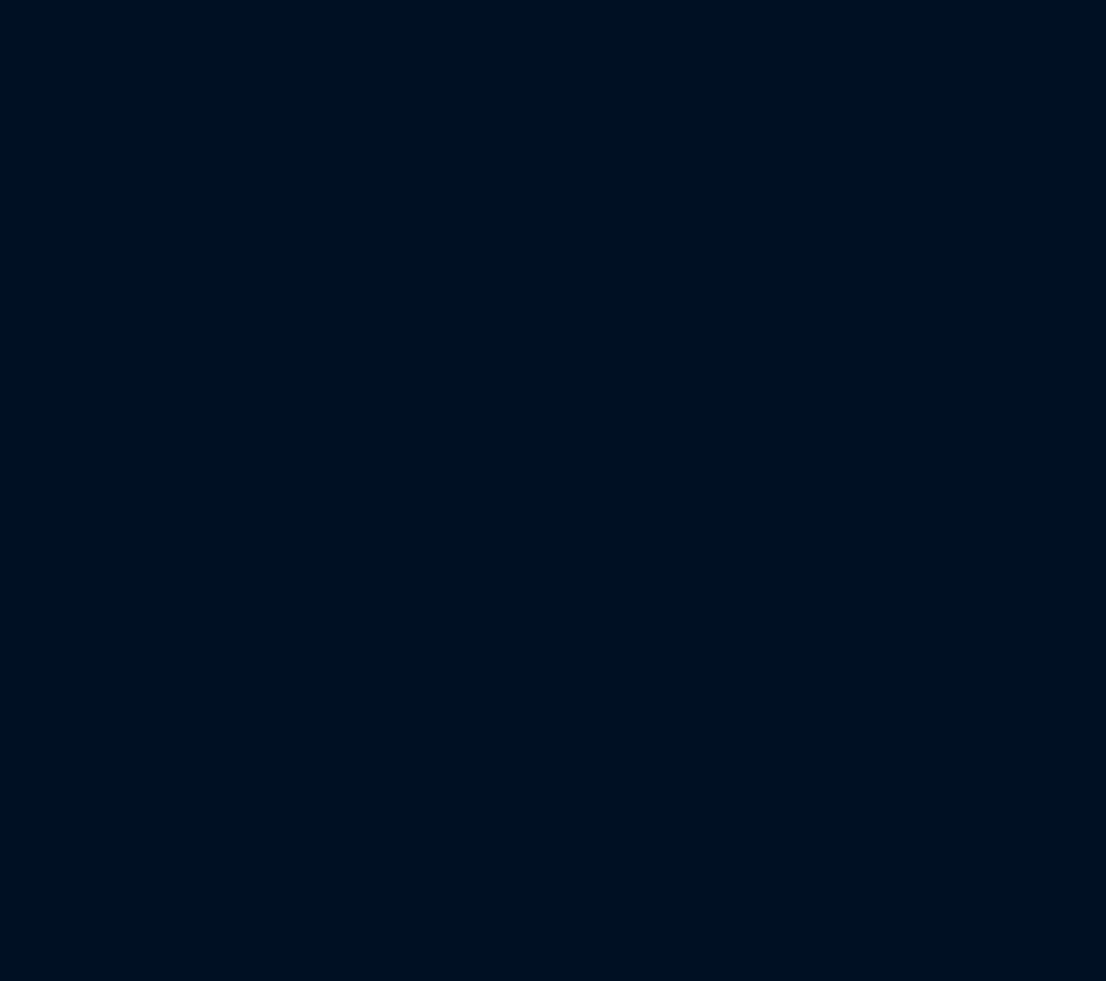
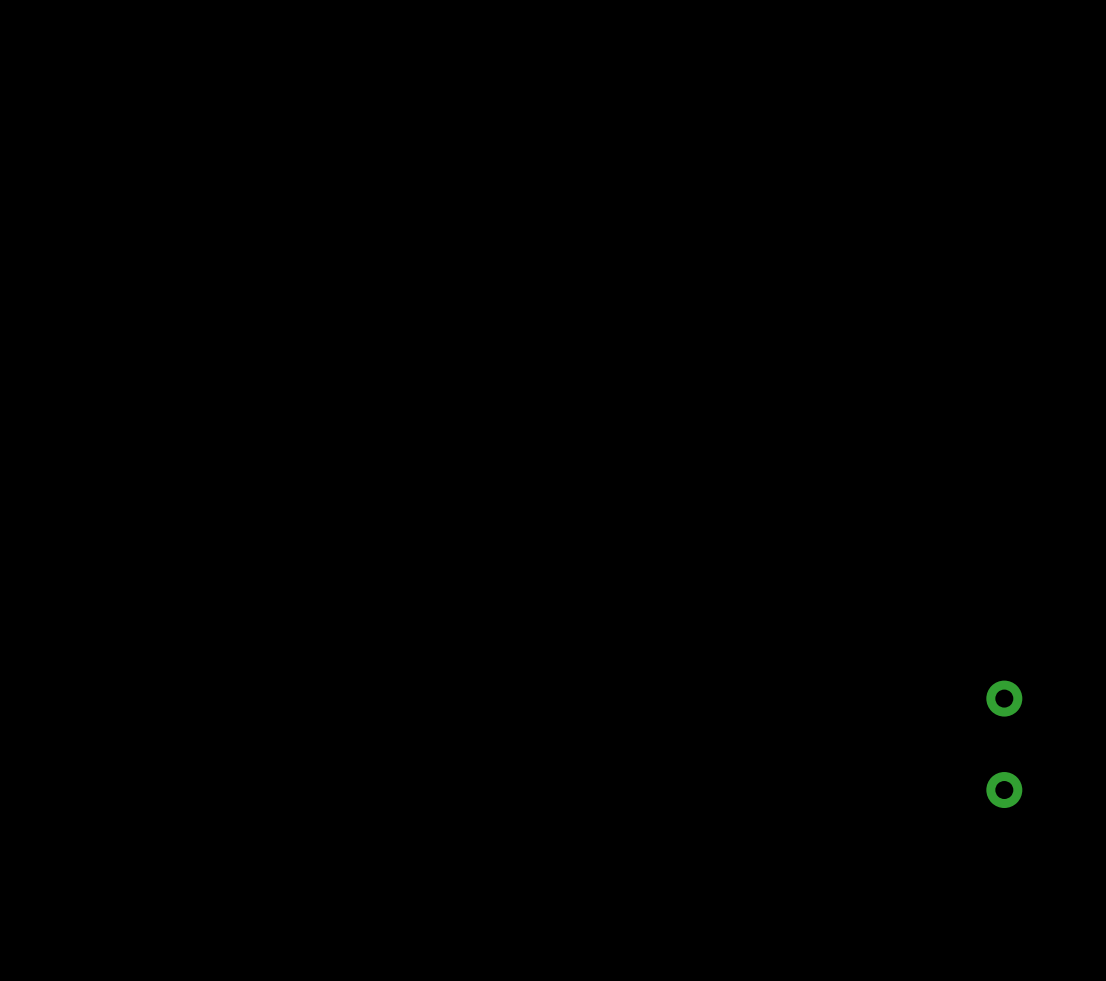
part: none -> (1004, 744)

